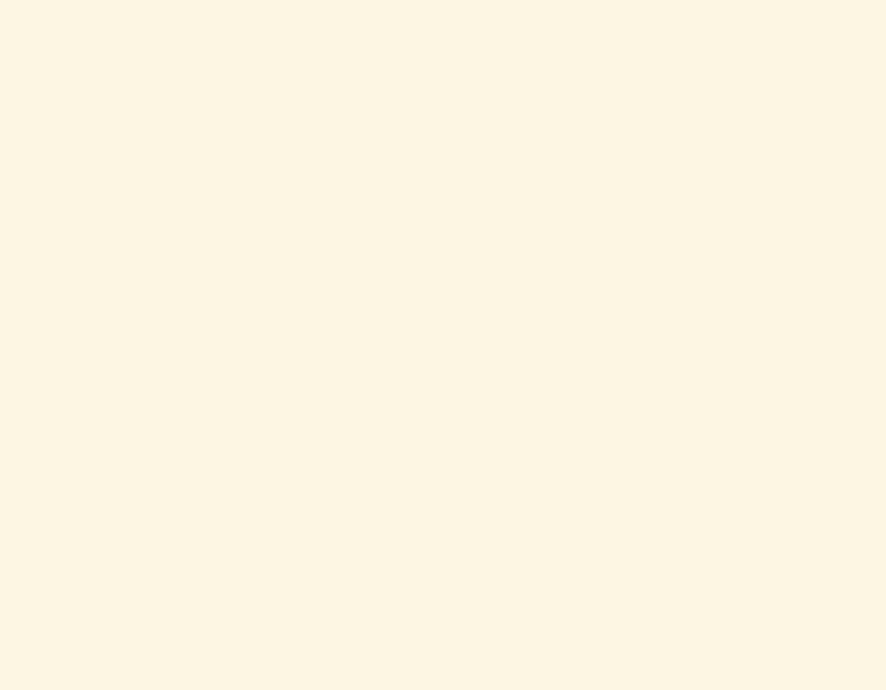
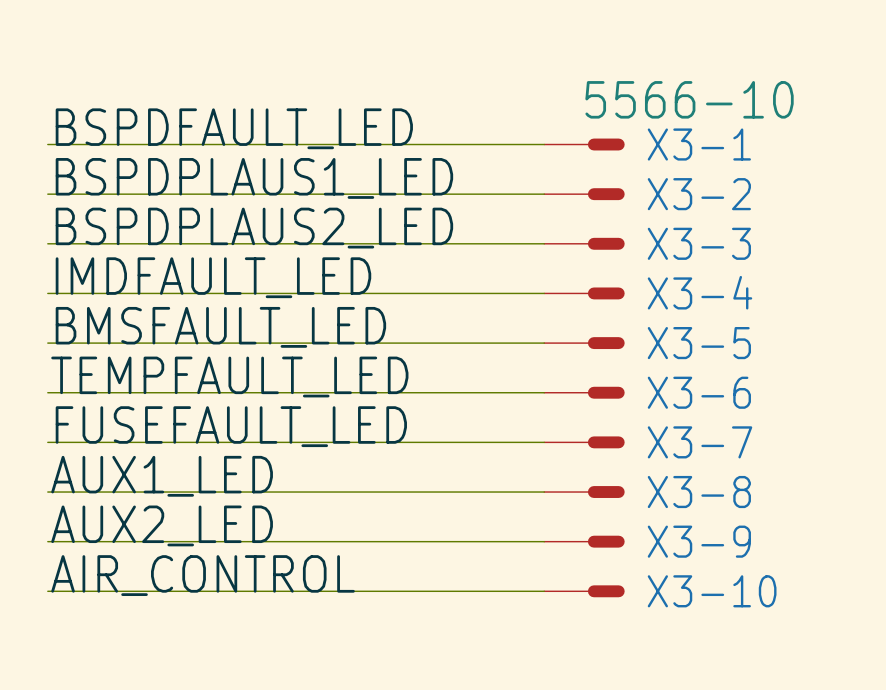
label: none -> BSPDFAULT_LED (234, 128)
wire: none -> (47, 144) (544, 144)
X3-1: none -> 5566-10 (584, 144)
label: none -> BSPDPLAUS1_LED (254, 178)
wire: none -> (47, 194) (544, 194)
X3-2: none -> (584, 194)
label: none -> BSPDPLAUS2_LED (254, 228)
wire: none -> (47, 243) (544, 243)
X3-3: none -> (584, 243)
label: none -> IMDFAULT_LED (213, 277)
wire: none -> (47, 293) (544, 293)
X3-4: none -> (584, 293)
label: none -> BMSFAULT_LED (220, 327)
wire: none -> (47, 343) (544, 343)
X3-5: none -> (584, 343)
label: none -> TEMPFAULT_LED (229, 377)
wire: none -> (47, 392) (544, 392)
X3-6: none -> (584, 392)
label: none -> FUSEFAULT_LED (231, 426)
wire: none -> (47, 442) (544, 442)
X3-7: none -> (584, 442)
label: none -> AUX1_LED (162, 476)
wire: none -> (47, 492) (544, 492)
X3-8: none -> (584, 492)
label: none -> AUX2_LED (162, 525)
wire: none -> (47, 541) (544, 541)
X3-9: none -> (584, 541)
label: none -> AIR_CONTROL (203, 575)
wire: none -> (47, 591) (544, 591)
X3-10: none -> (584, 591)

